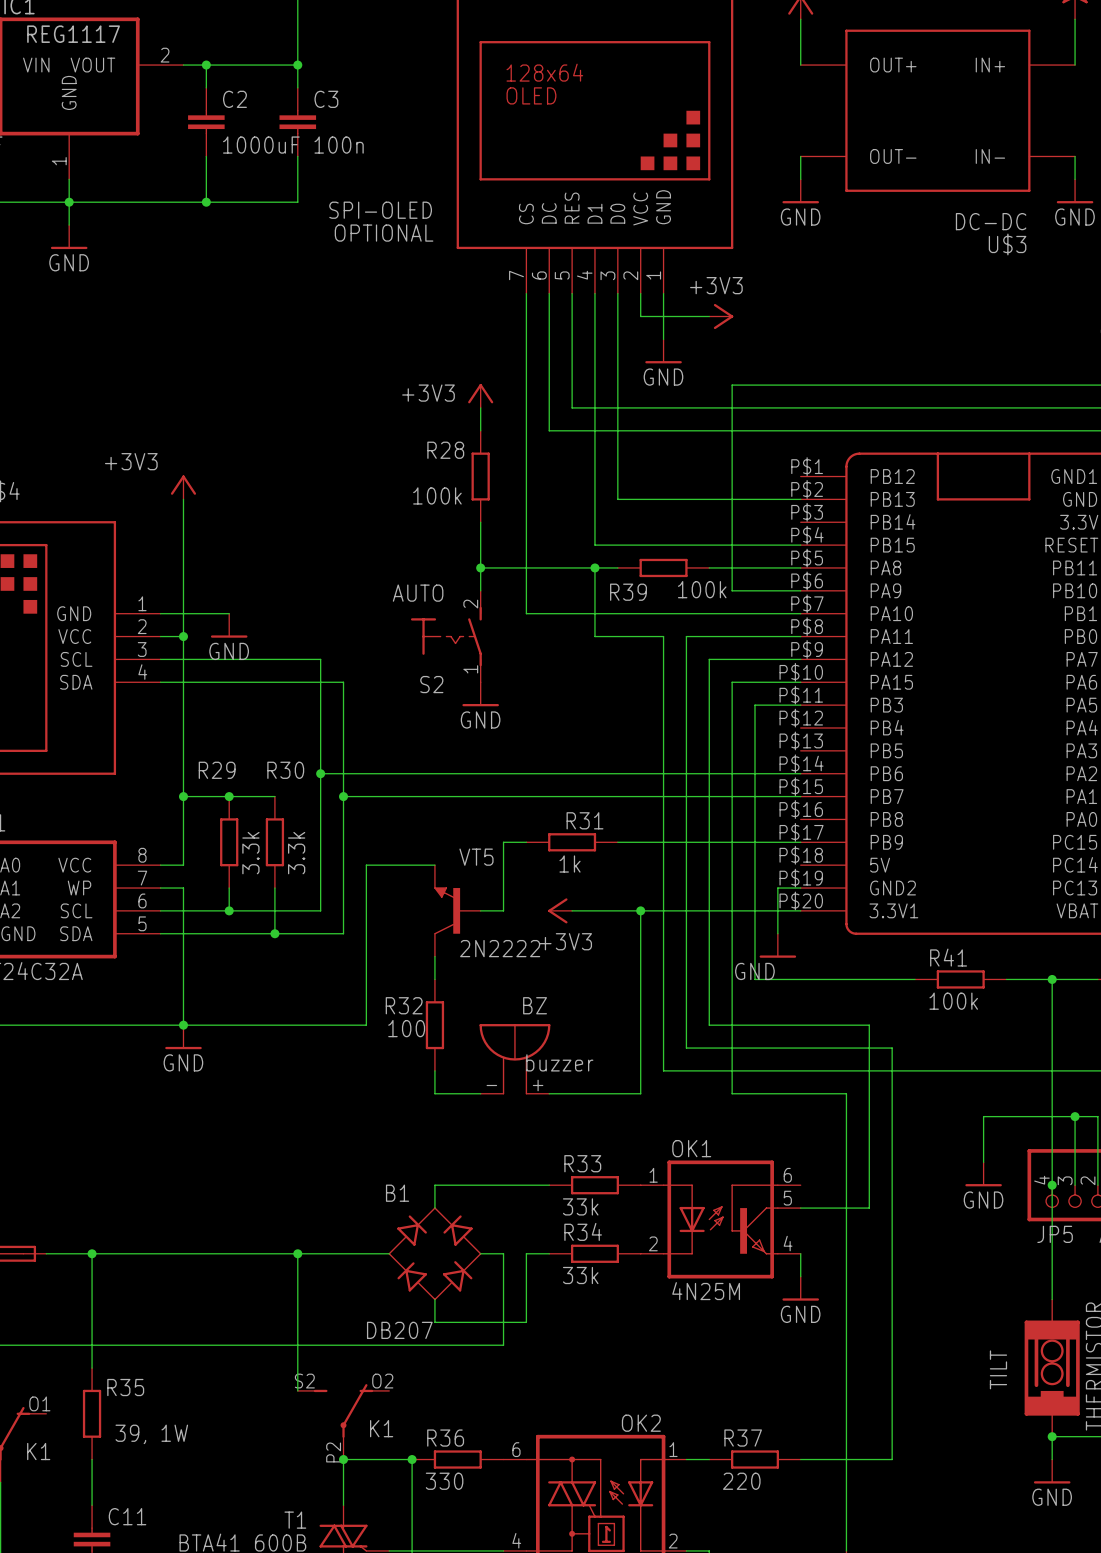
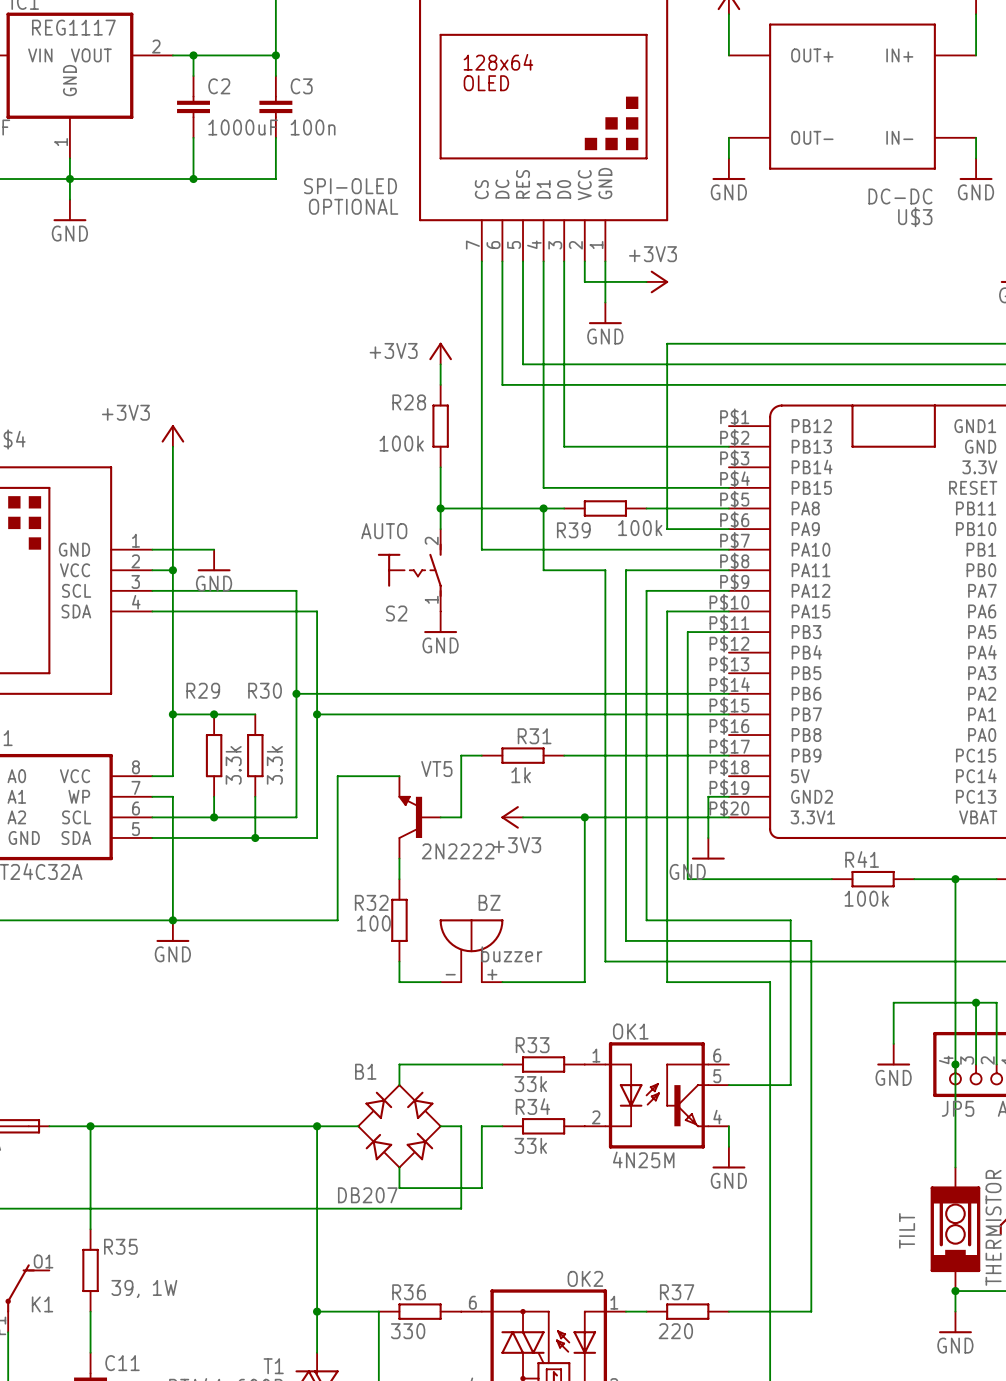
wire: (297, 1253) (297, 1390) -> none
junction position: (297, 1253) -> (317, 1126)
wire: none -> (317, 1126) (317, 1311)
K1: (343, 1421) -> none
junction: (412, 1459) -> none

